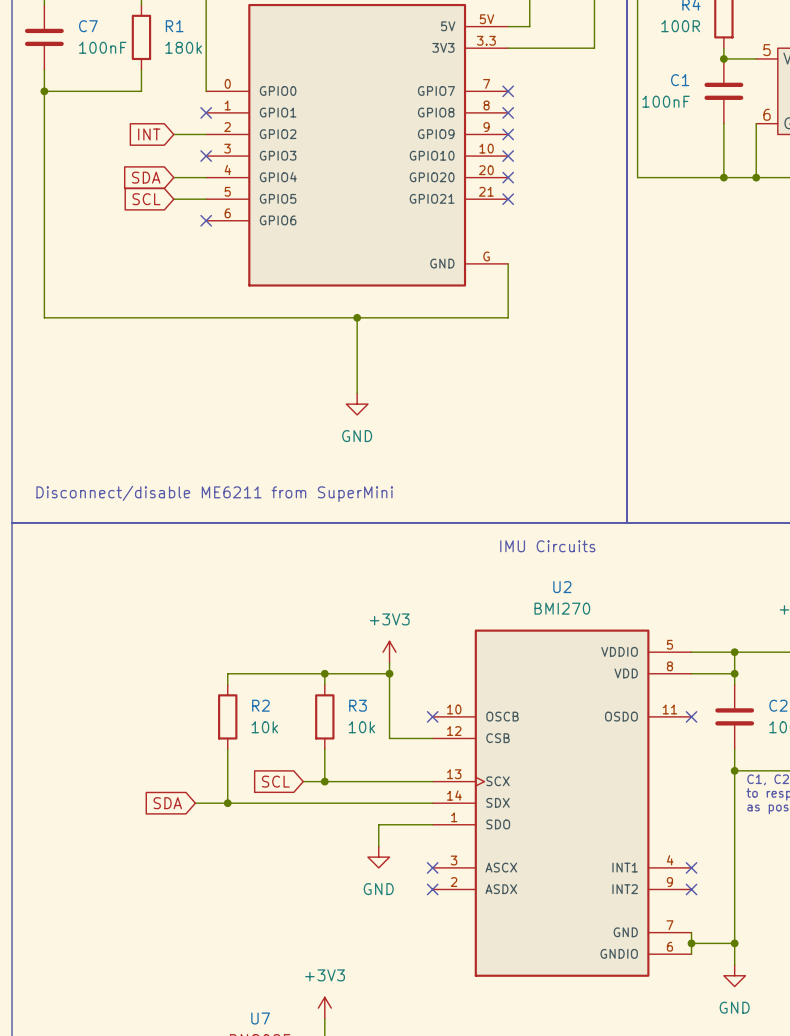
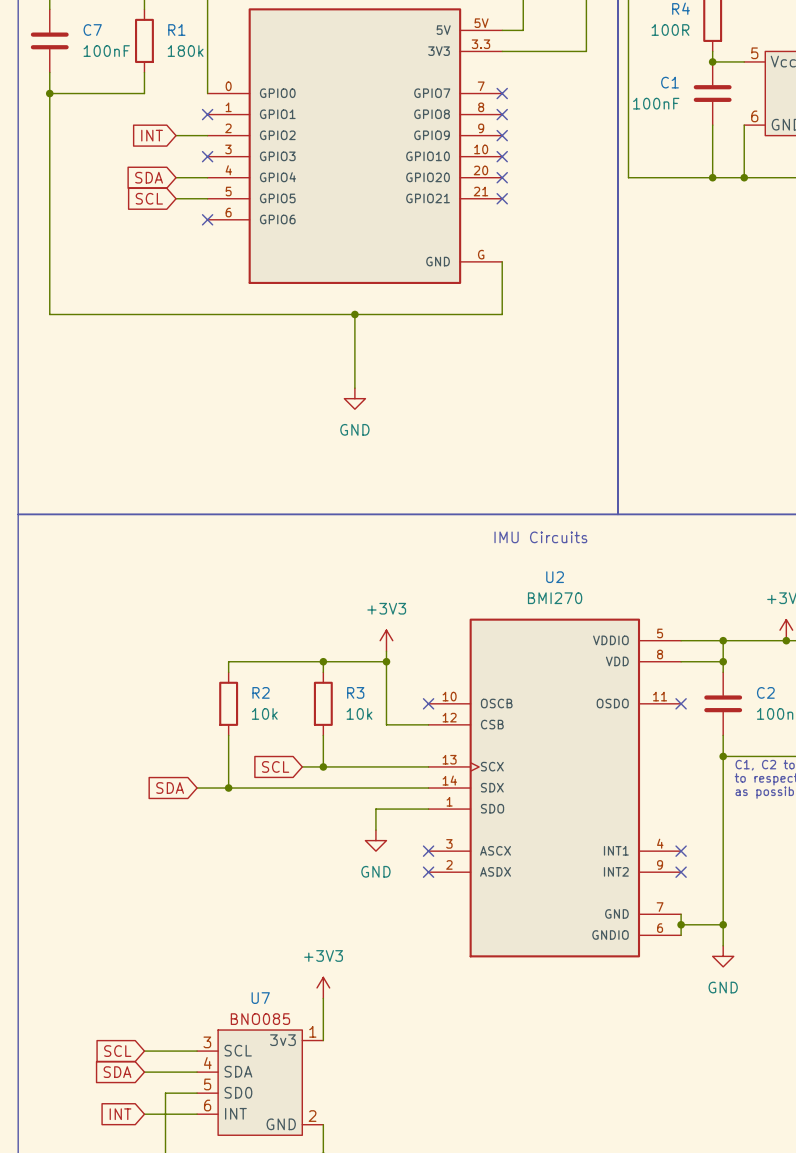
text: Disconnect/disable ME6211 from SuperMini (214, 493) -> none

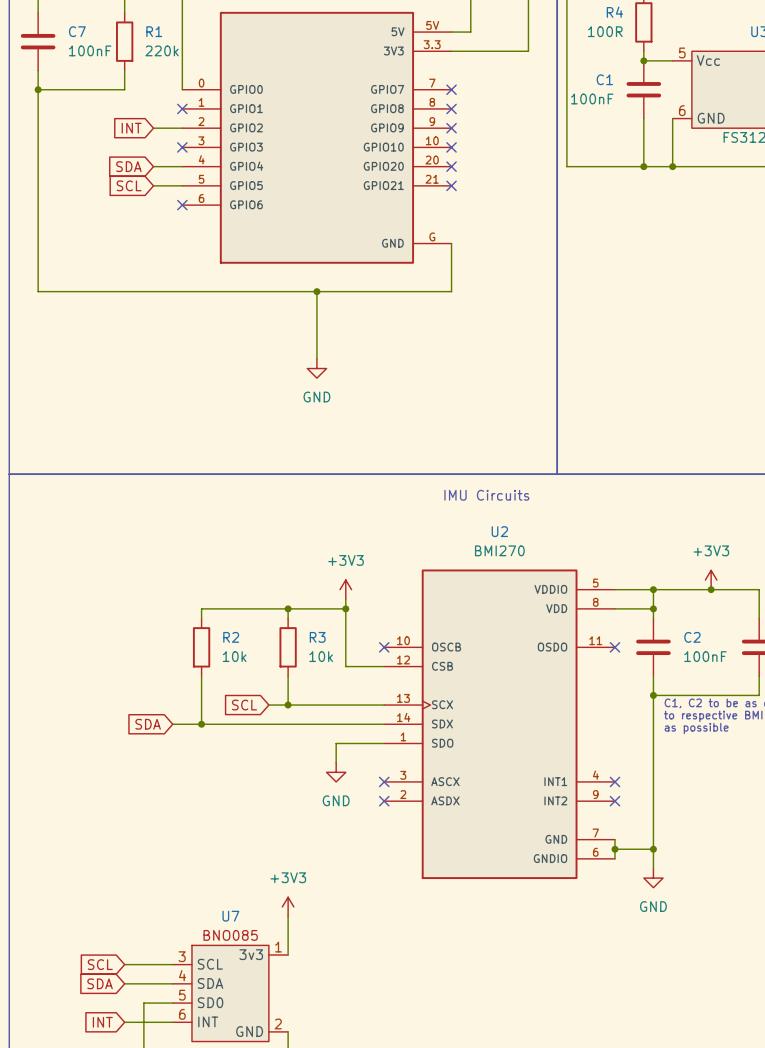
R1 value: 180k (185, 51) -> 220k (162, 50)

